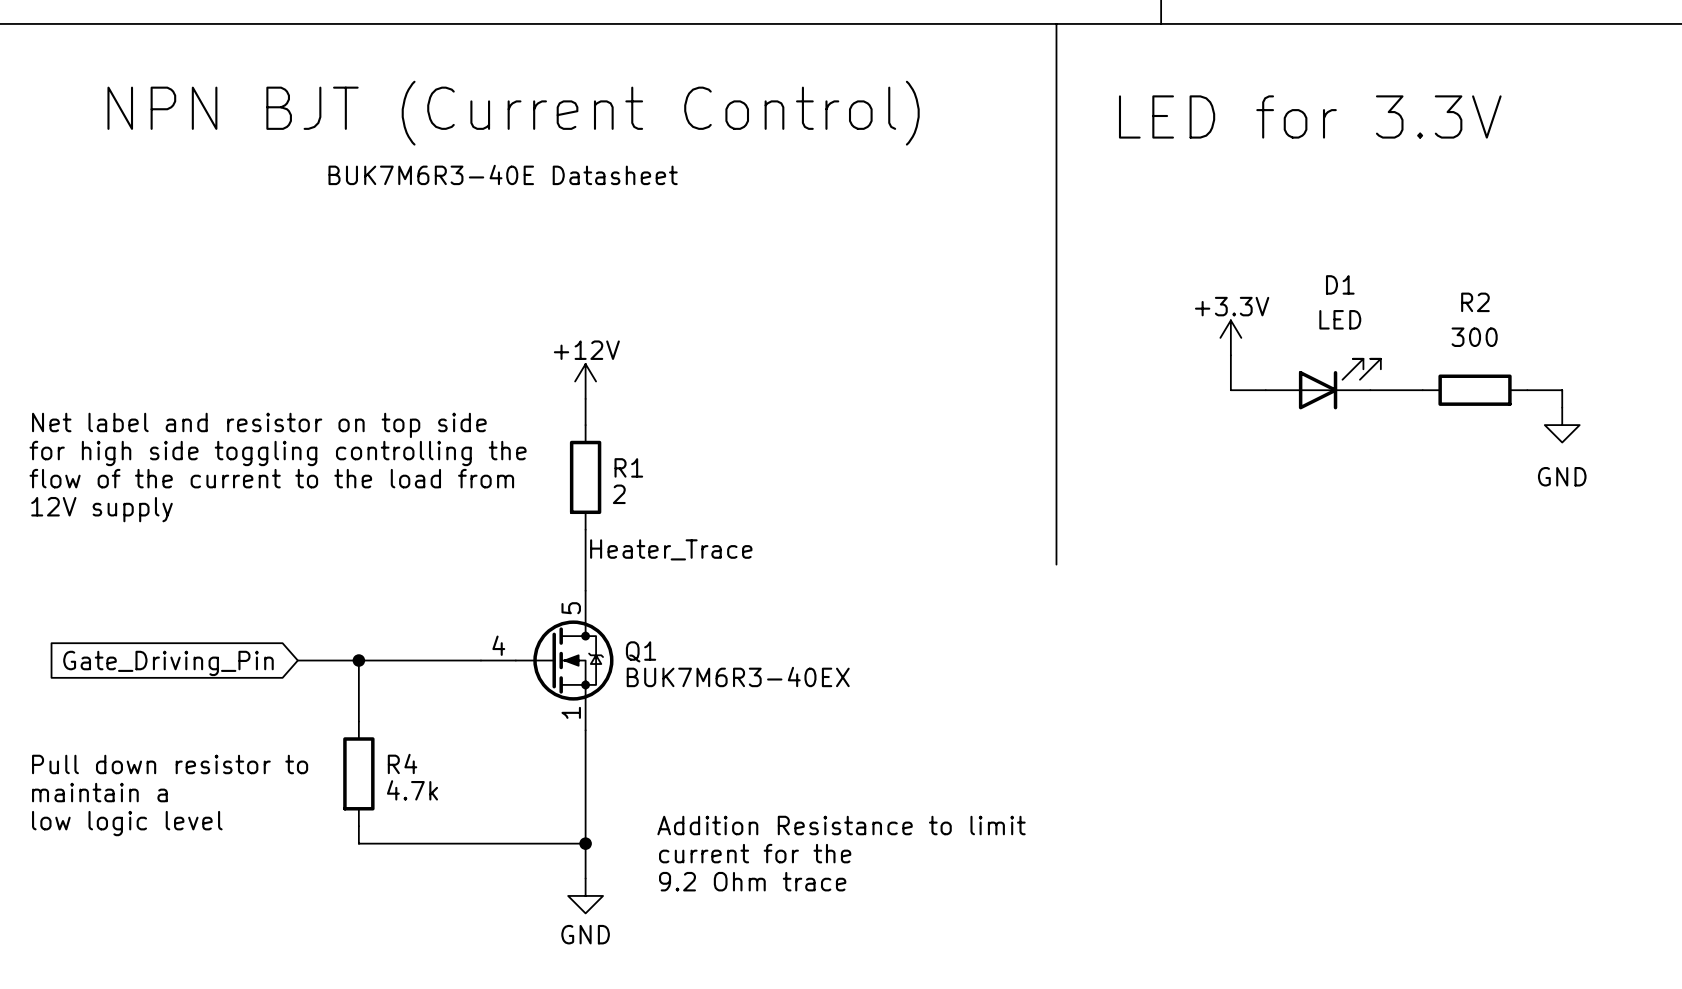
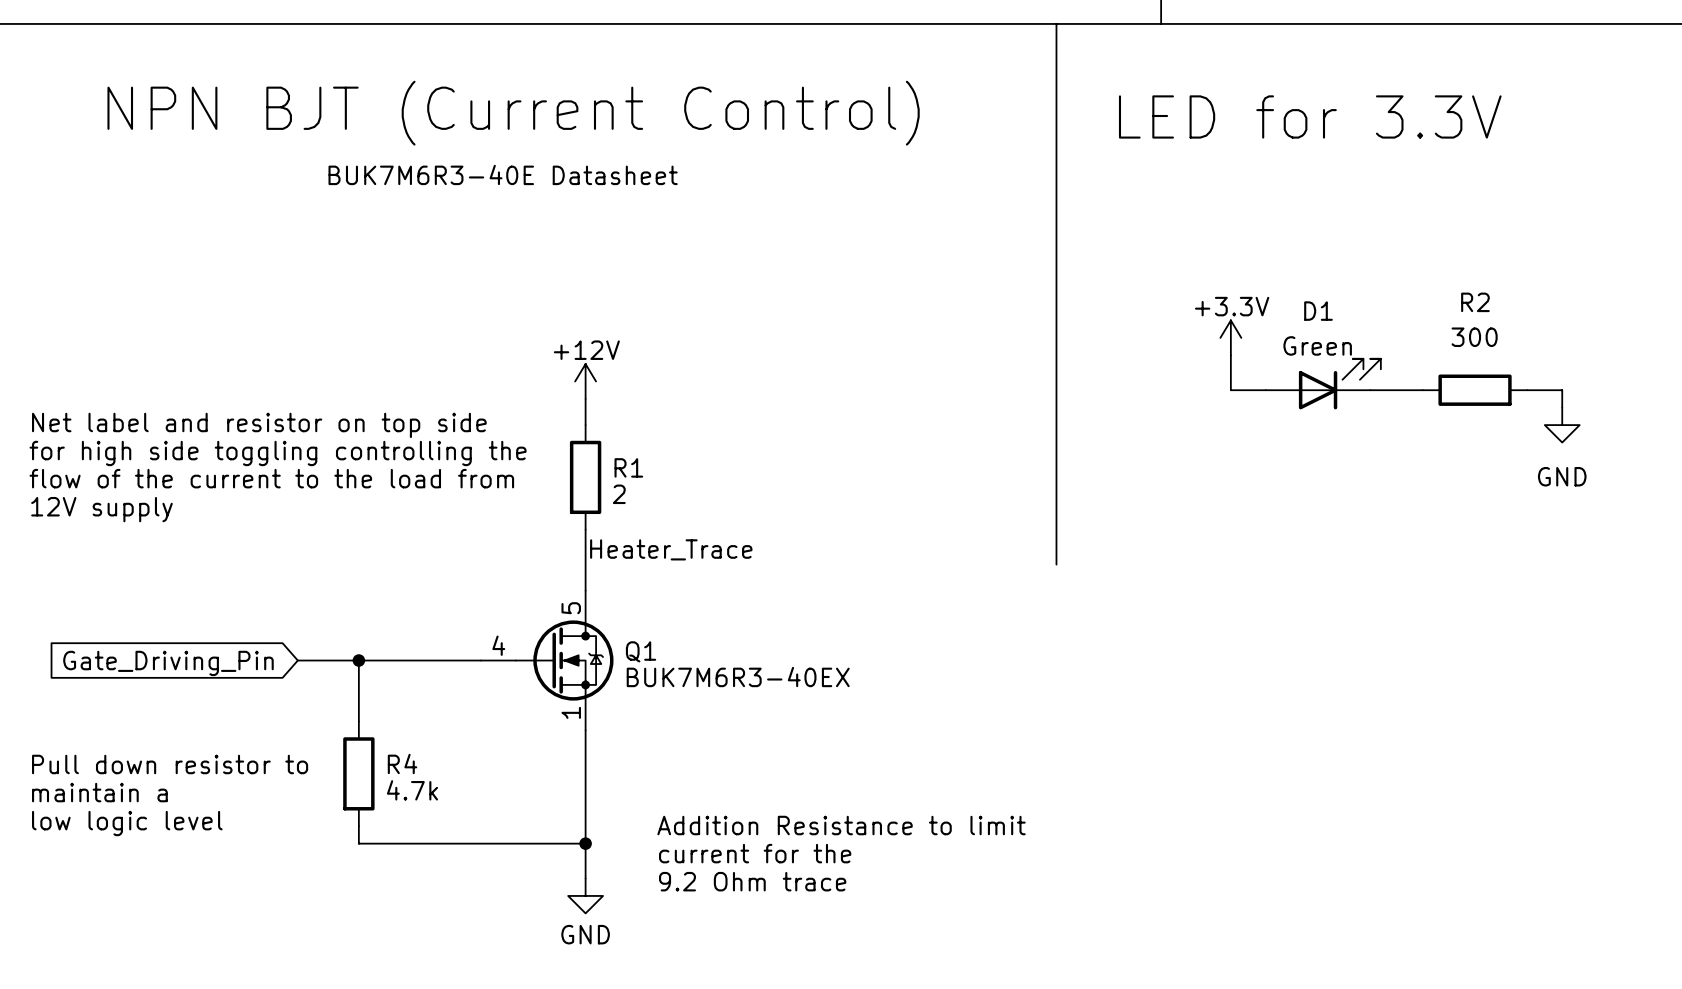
D1 name position: D1 (1340, 284) -> D1 (1318, 311)
D1 value: LED (1340, 319) -> Green (1317, 345)

